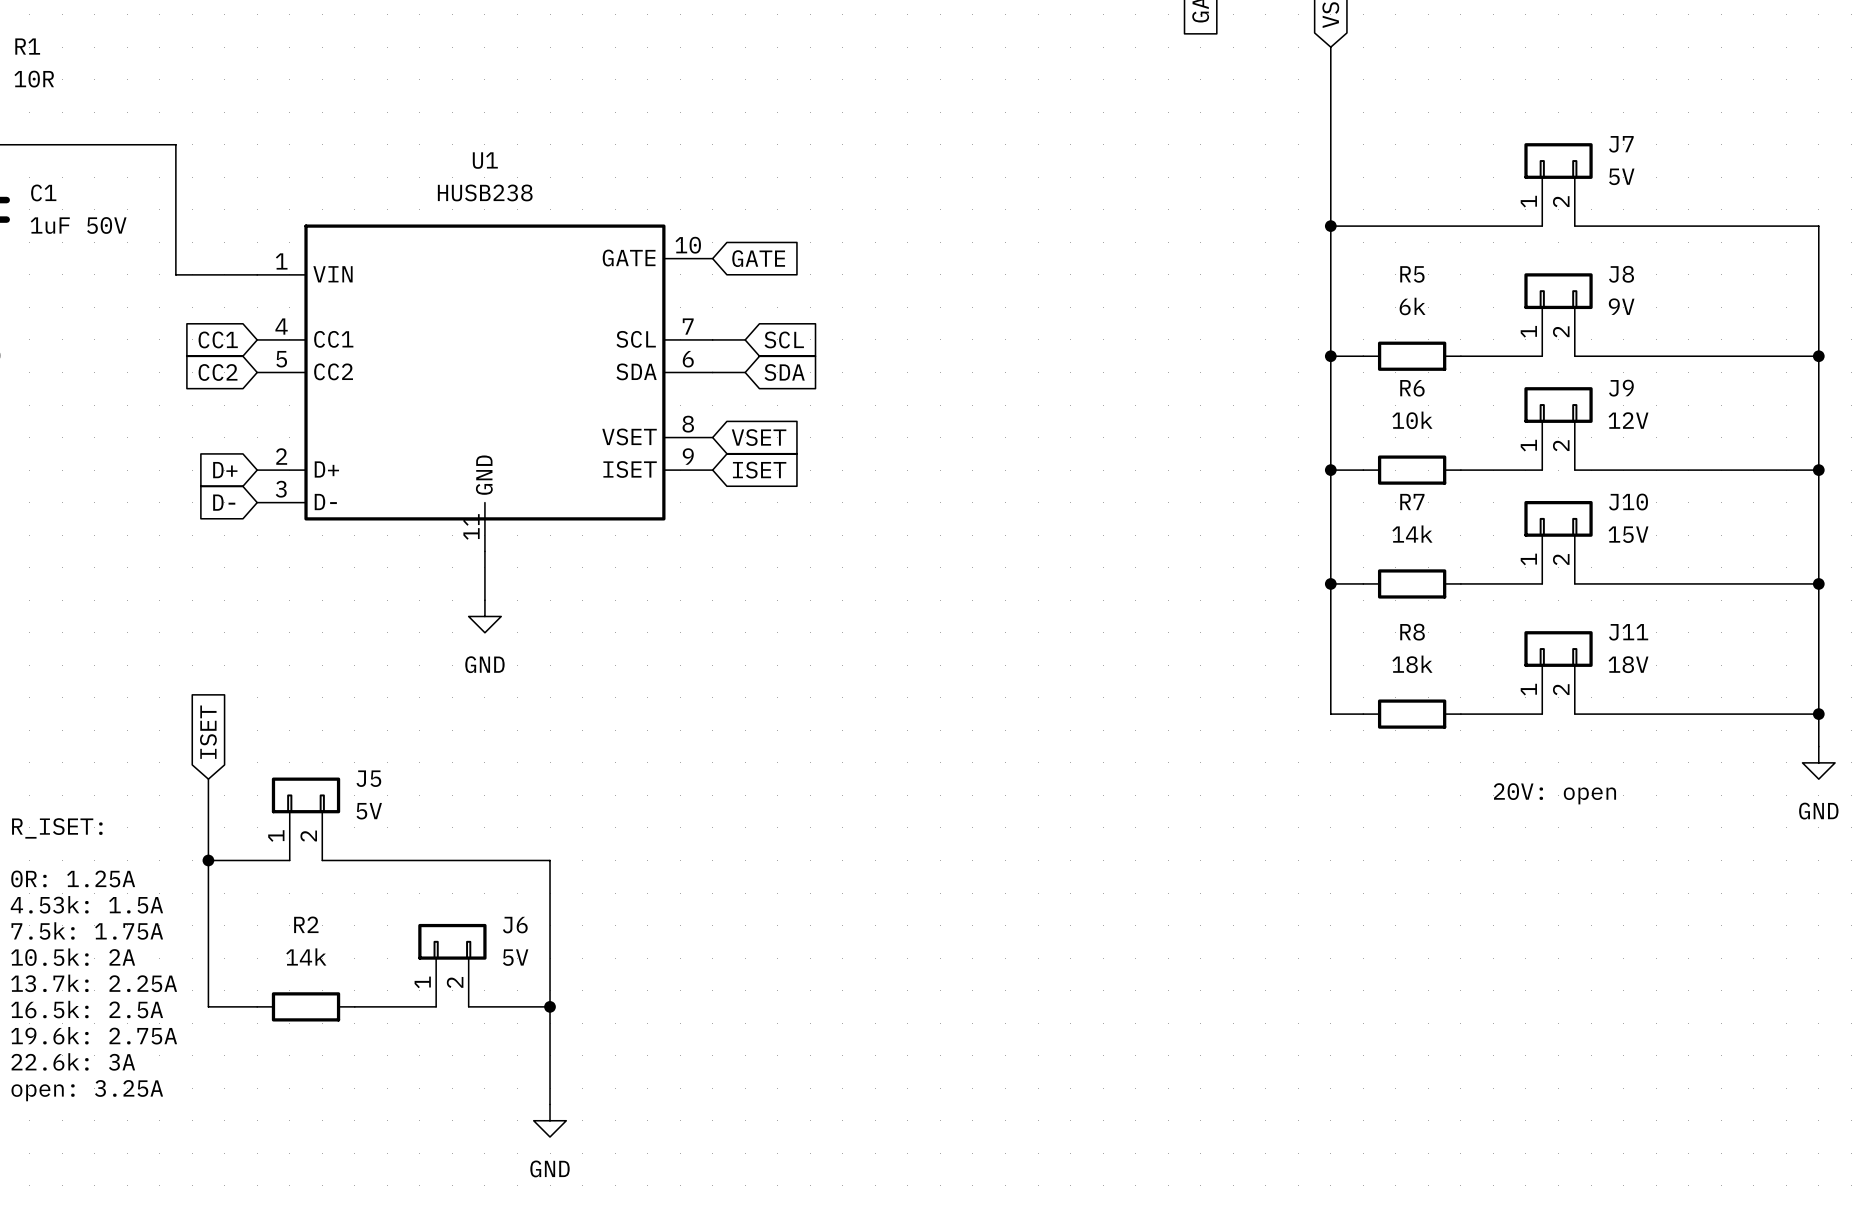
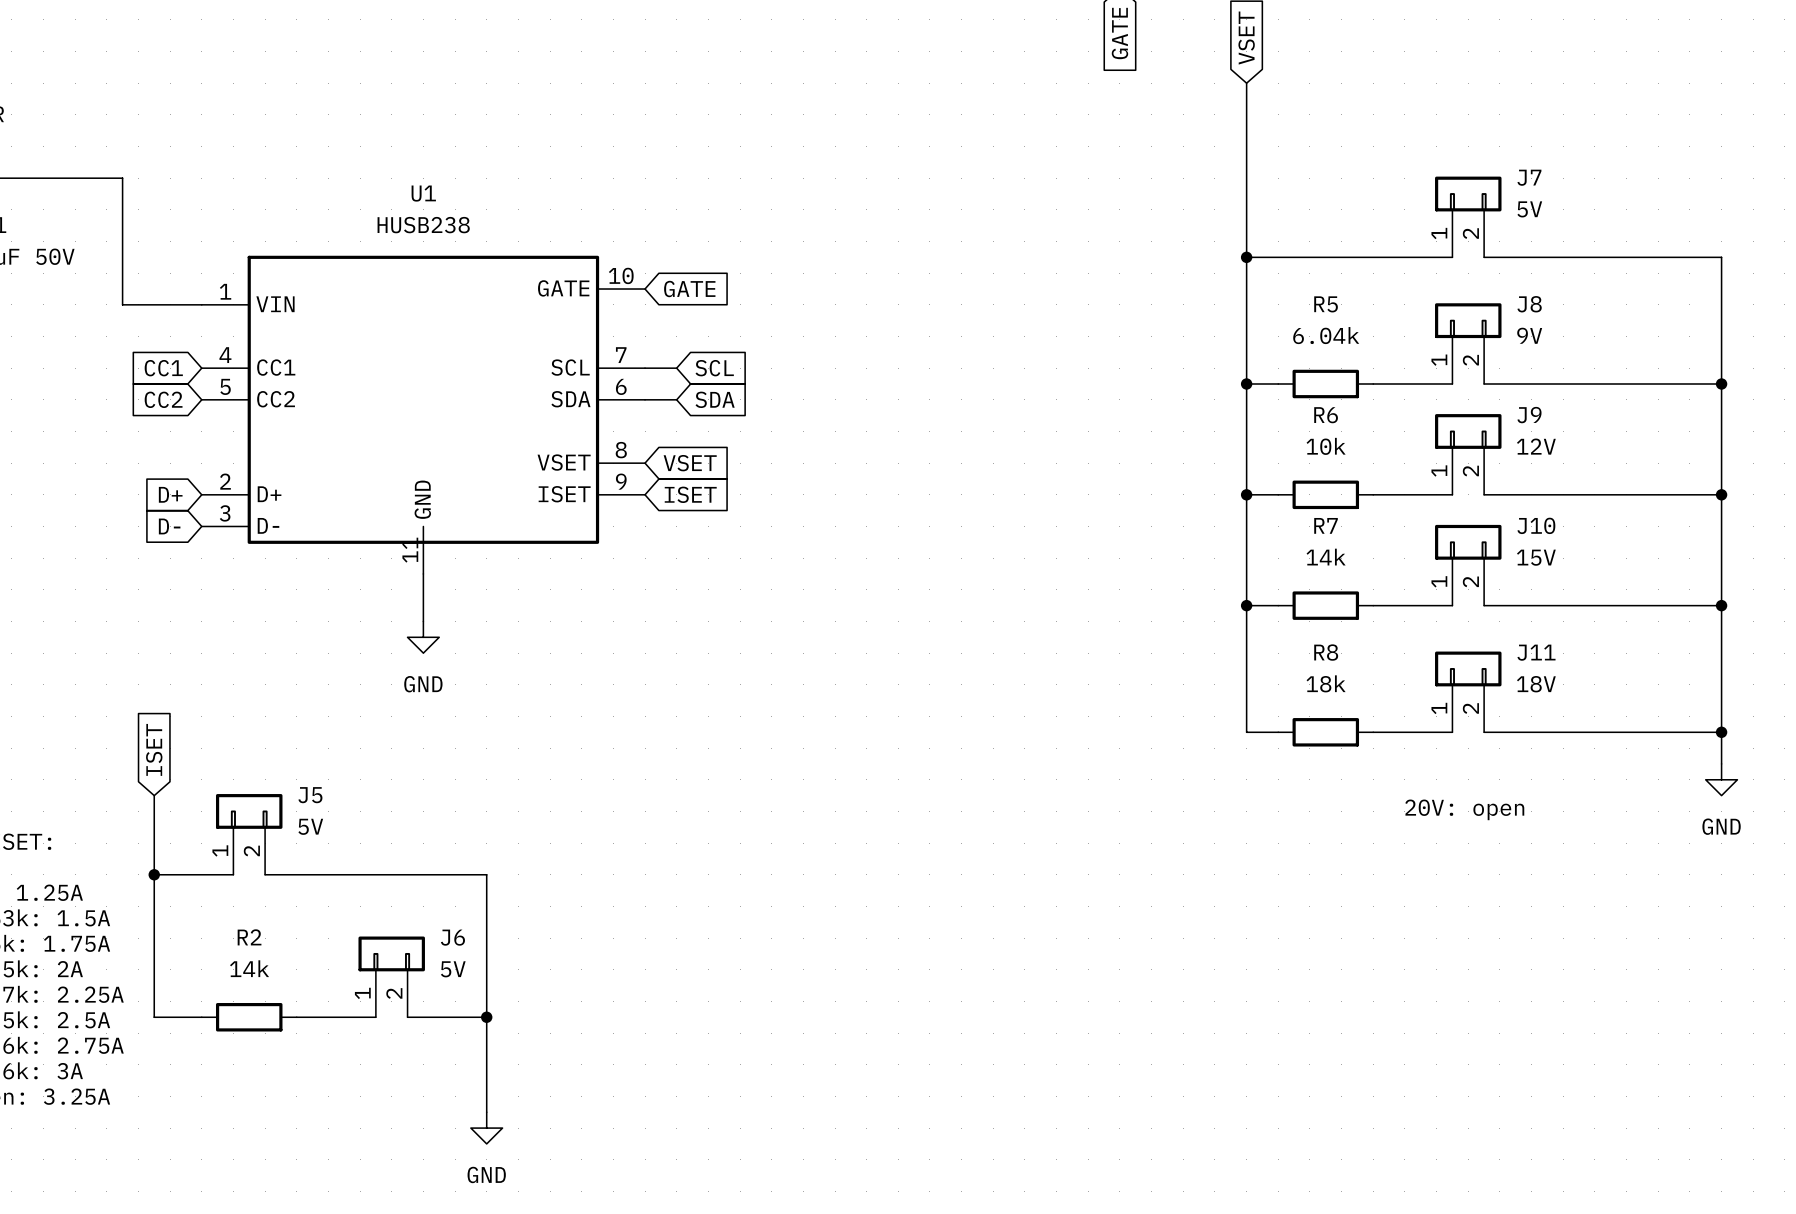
R5 value: 6k (1412, 306) -> 6.04k (1326, 335)

